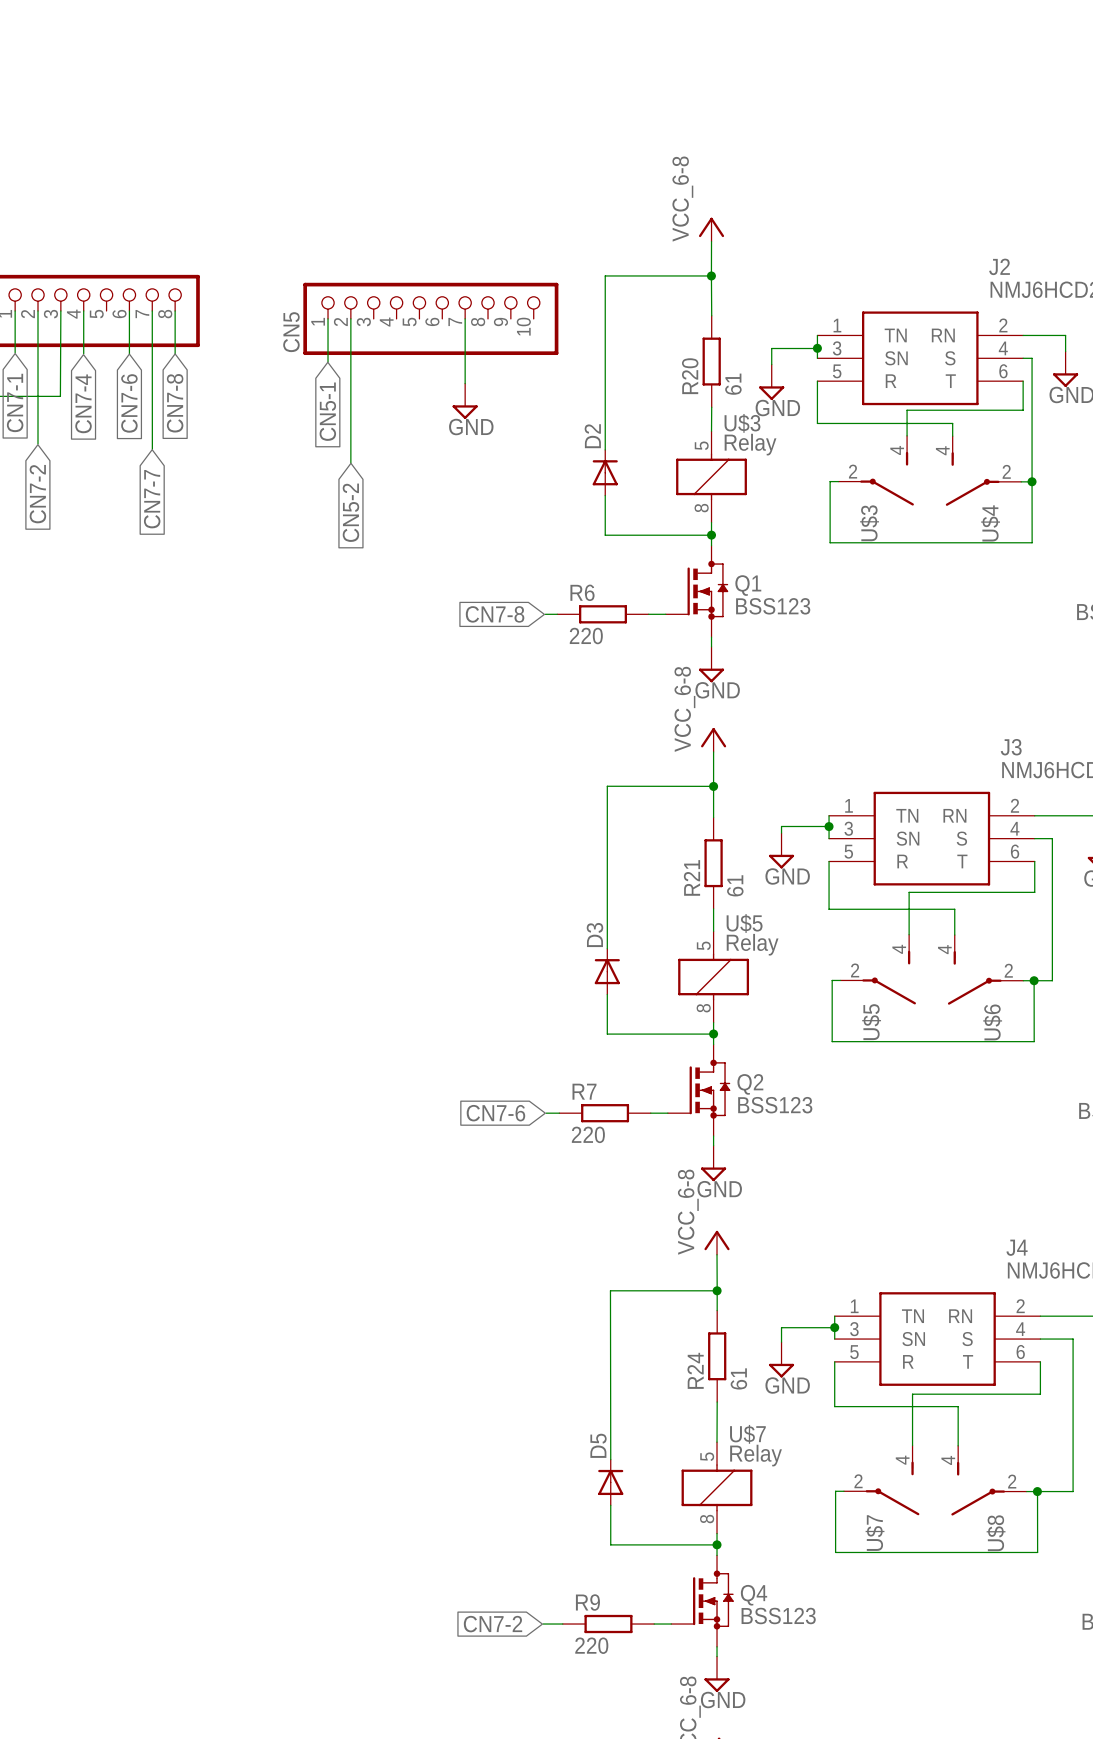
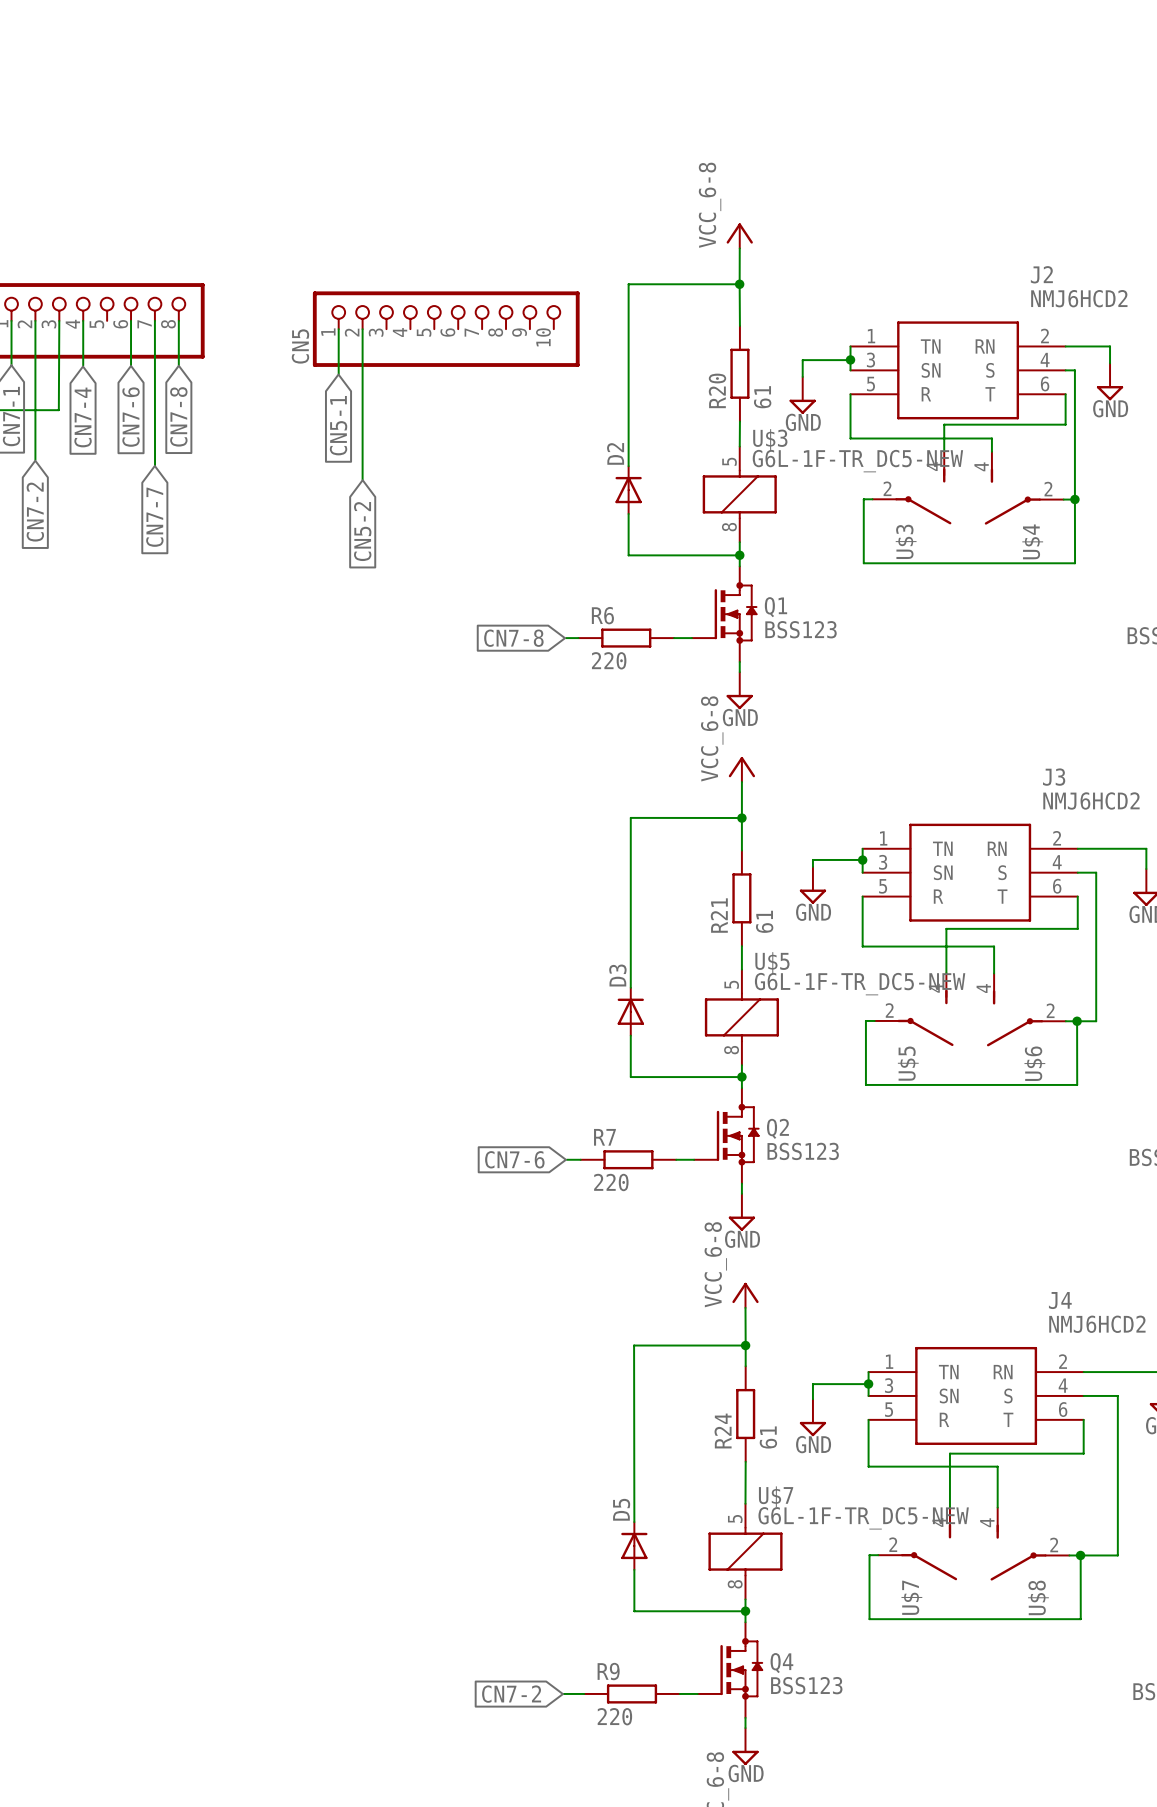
wire: (465, 318) (465, 383) -> none
power symbol: GND (465, 401) -> none
U$3 value: Relay (750, 444) -> G6L-1F-TR_DC5-NEW (857, 461)
U$5 value: Relay (752, 944) -> G6L-1F-TR_DC5-NEW (860, 984)
U$7 value: Relay (756, 1455) -> G6L-1F-TR_DC5-NEW (863, 1518)

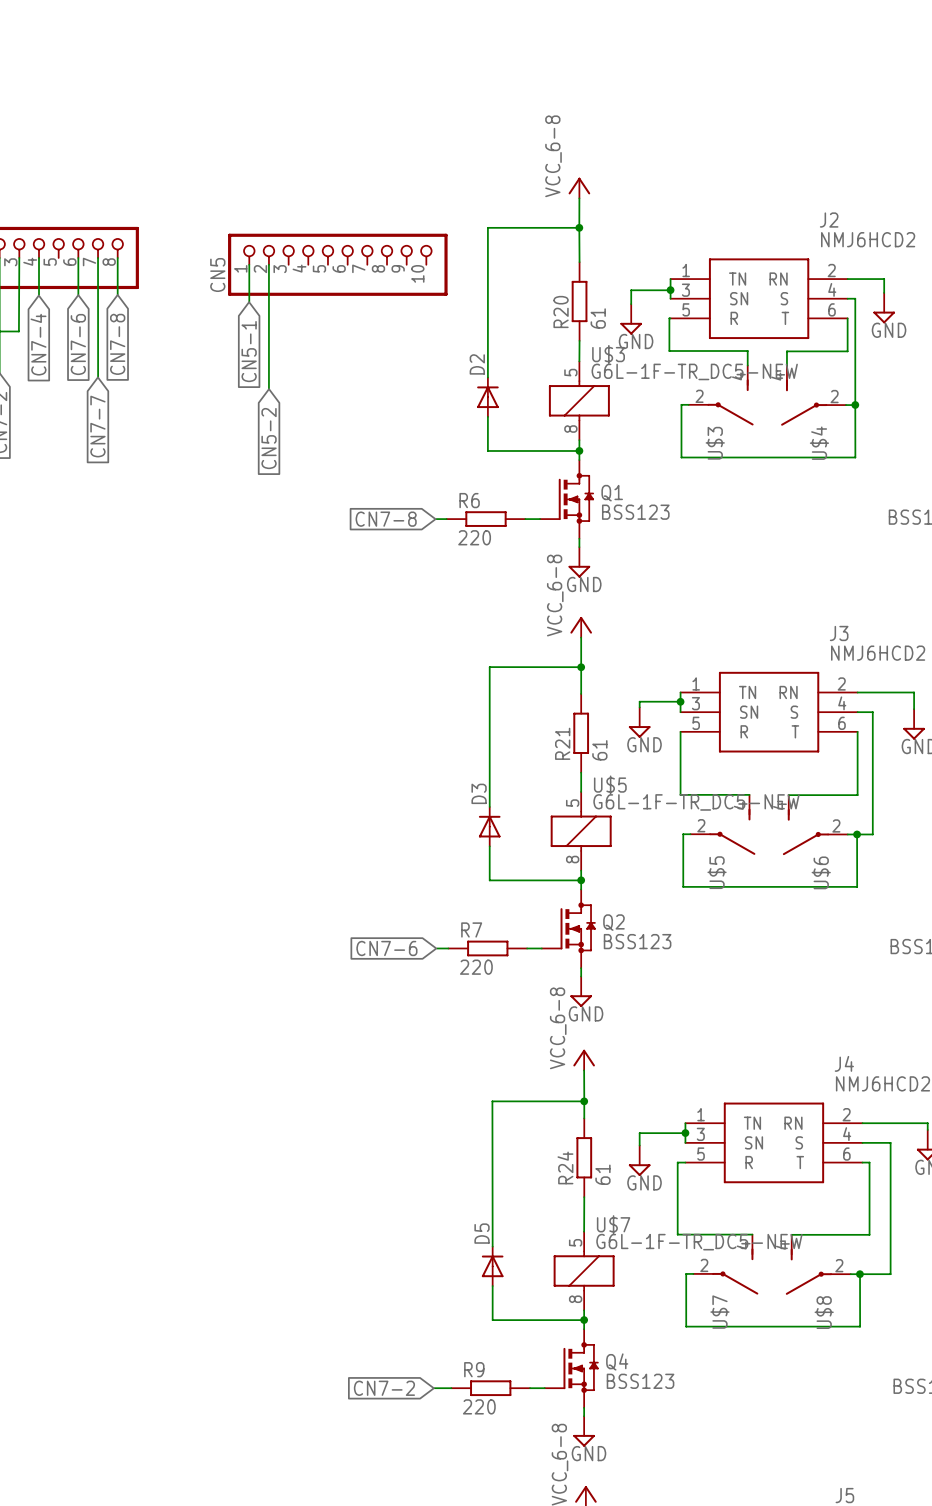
wire: (850, 394) (850, 438) (991, 438) -> (670, 318) (669, 351) (747, 351)
wire: (1065, 424) (944, 424) (944, 433) -> (847, 343) (847, 351) (786, 351) (786, 354)
wire: (1077, 928) (946, 928) (946, 973) -> (857, 758) (857, 795) (788, 795)
wire: (862, 946) (994, 946) (994, 973) -> (680, 772) (680, 794) (749, 794)
wire: (868, 1419) (868, 1466) (997, 1466) (997, 1507) -> (685, 1162) (677, 1162) (677, 1234) (752, 1234)
wire: (1083, 1419) (1083, 1453) (949, 1453) (949, 1507) -> (862, 1162) (869, 1162) (869, 1234) (791, 1234)

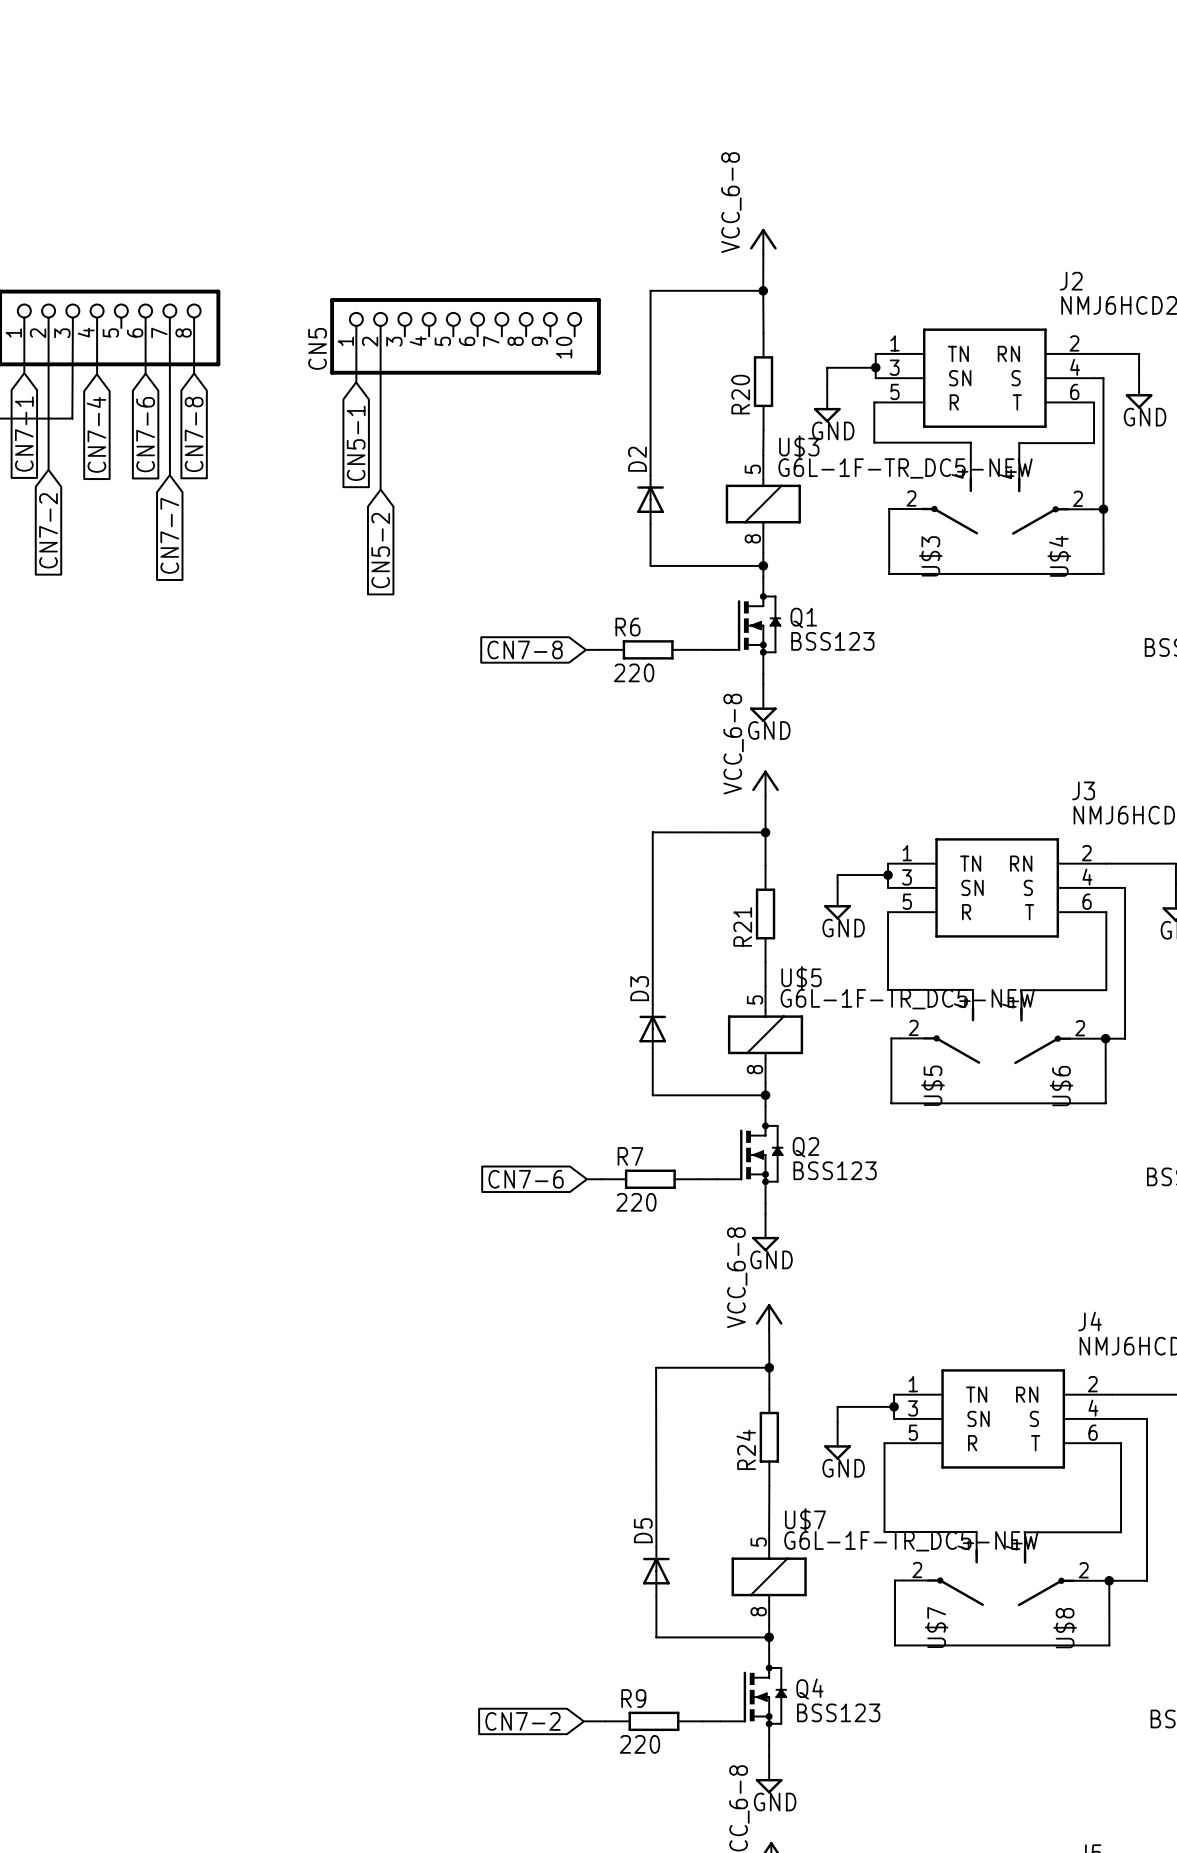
R20 value: 61 (598, 318) -> none
R21 value: 61 (599, 750) -> none
R24 value: 61 (602, 1174) -> none

